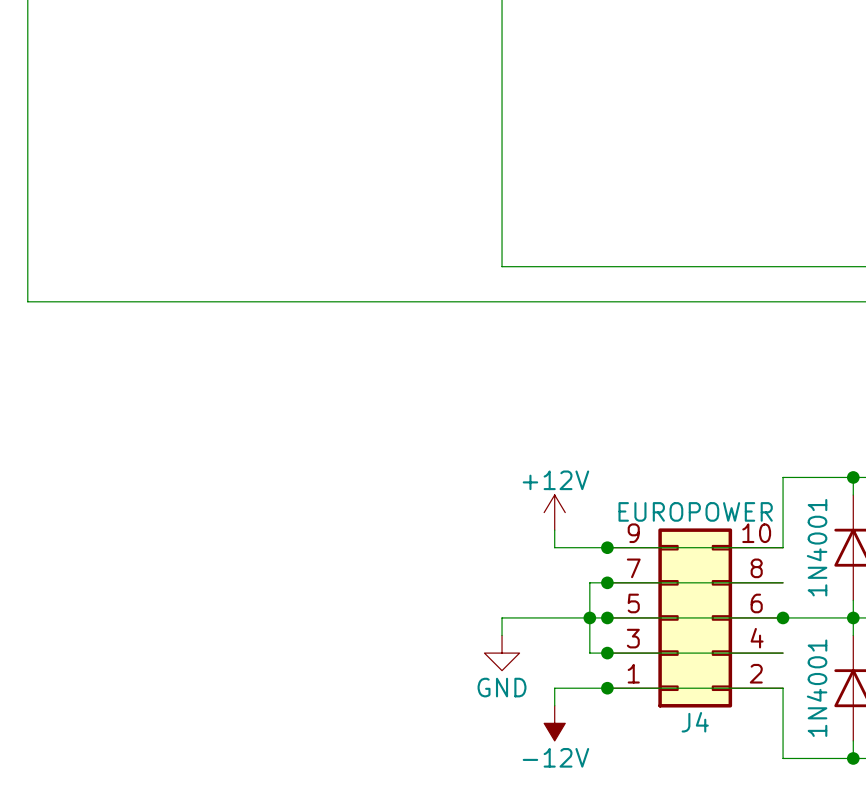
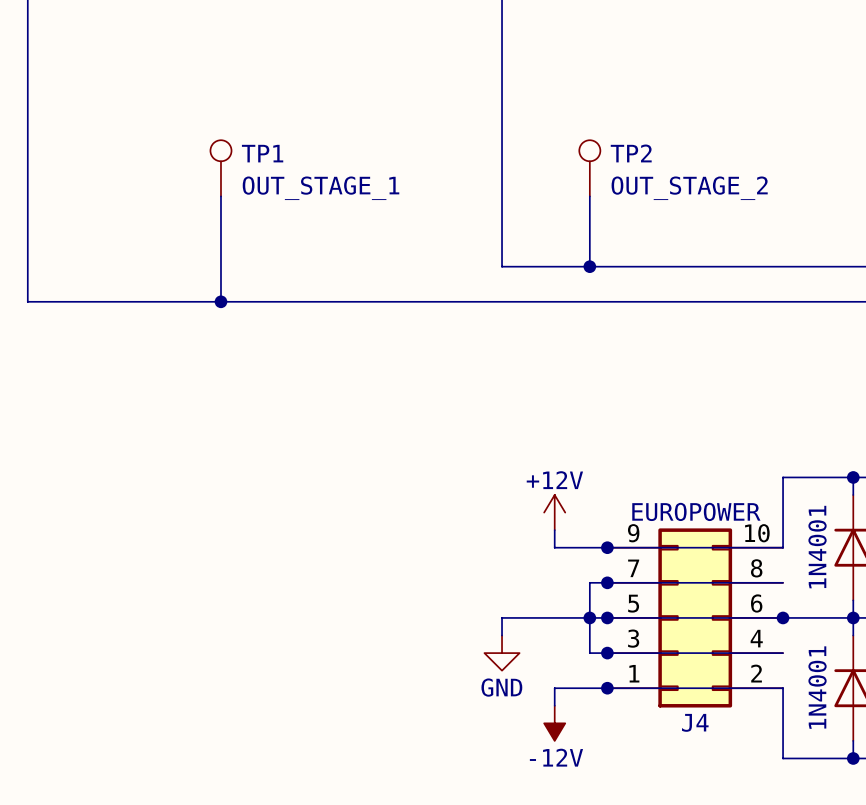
TP1: none -> OUT_STAGE_1 (220, 168)
TP2: none -> OUT_STAGE_2 (589, 168)
wire: none -> (220, 196) (220, 301)
wire: none -> (589, 196) (589, 266)
junction: none -> (589, 266)
junction: none -> (220, 301)

